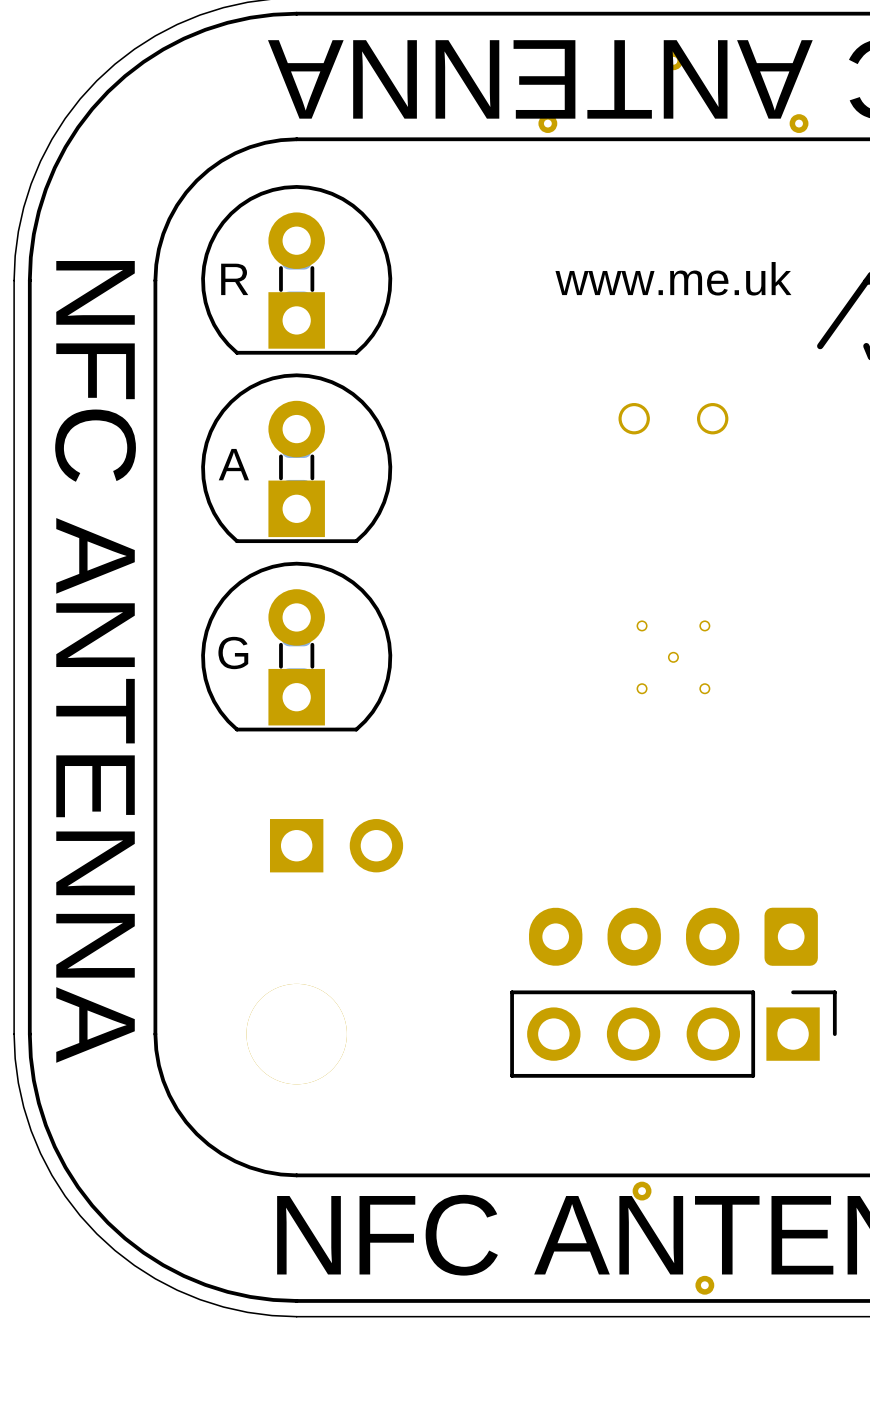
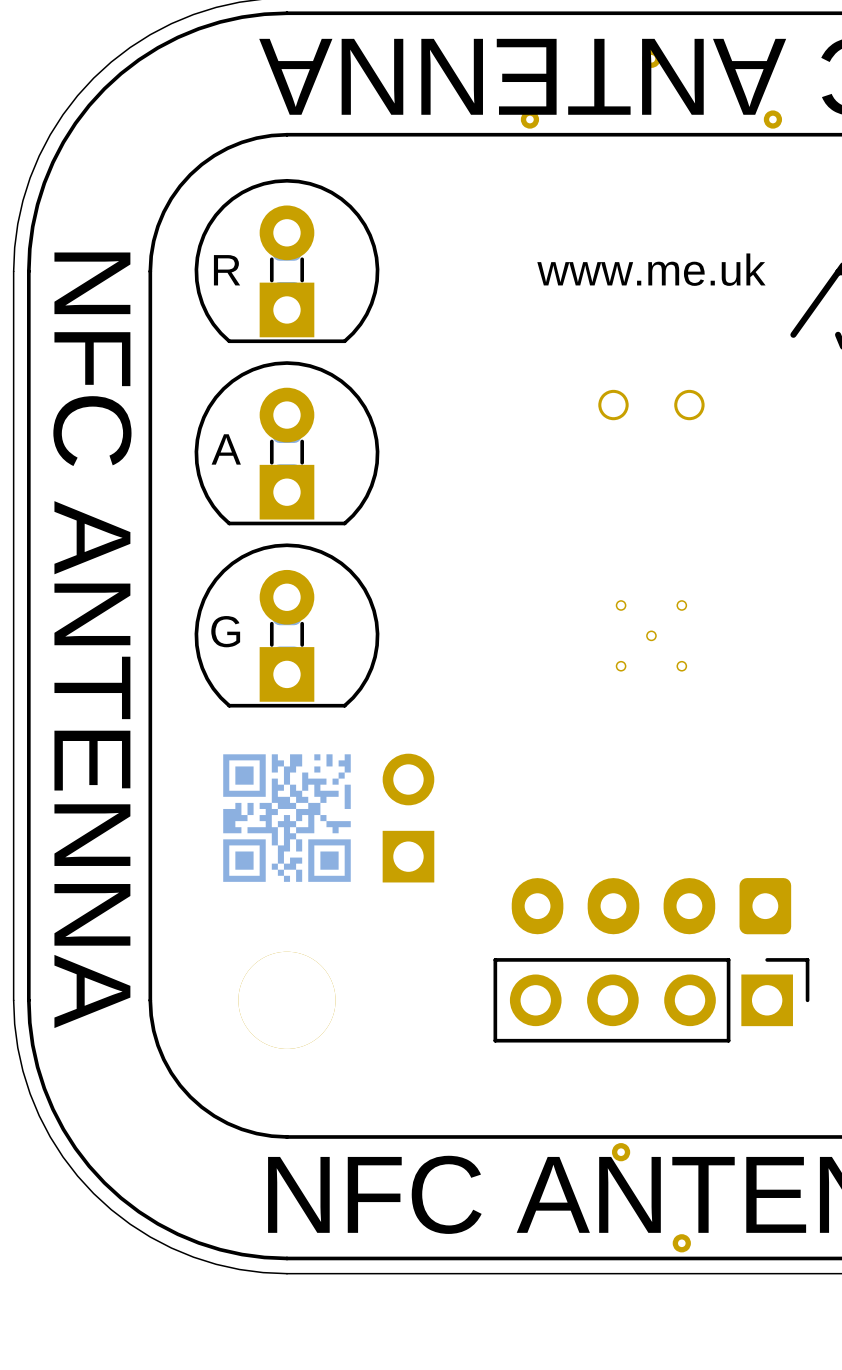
part: none -> (286, 818)
part rotation: 0° (336, 845) -> 90° counterclockwise (408, 818)
part position: (336, 845) -> (408, 818)

